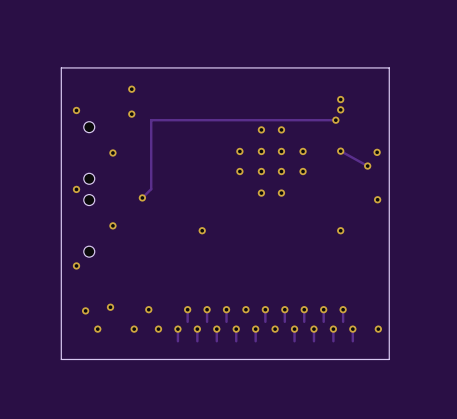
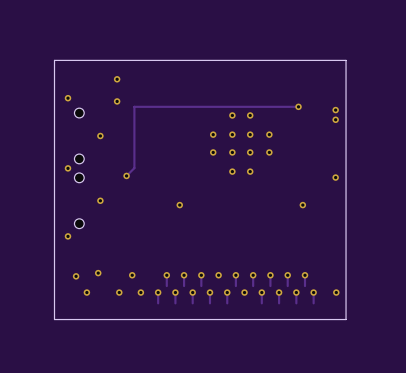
via: (340, 99) -> none
via: (340, 109) -> none
via: none -> (335, 110)
via: none -> (335, 119)
track: (340, 151) (367, 166) -> none
via: (340, 151) -> none
via: (377, 152) -> none
via: (367, 166) -> none

